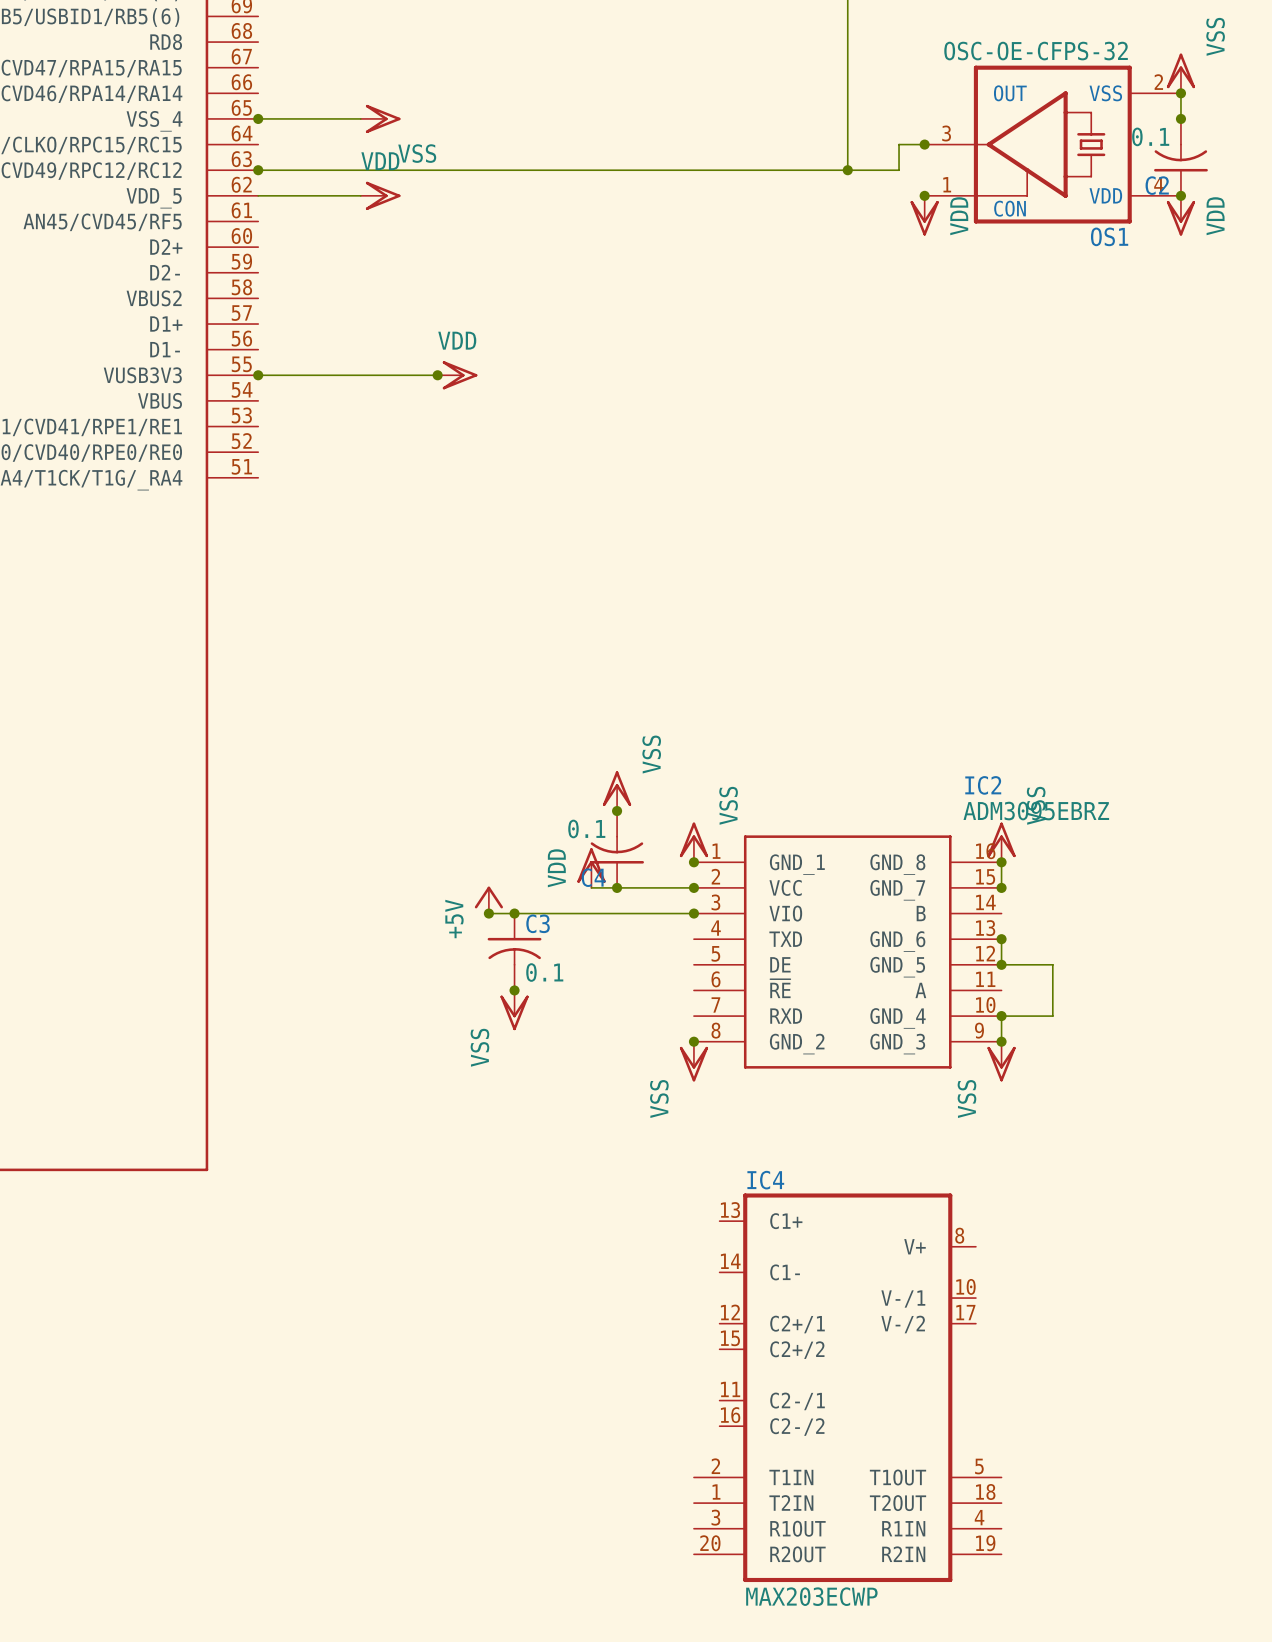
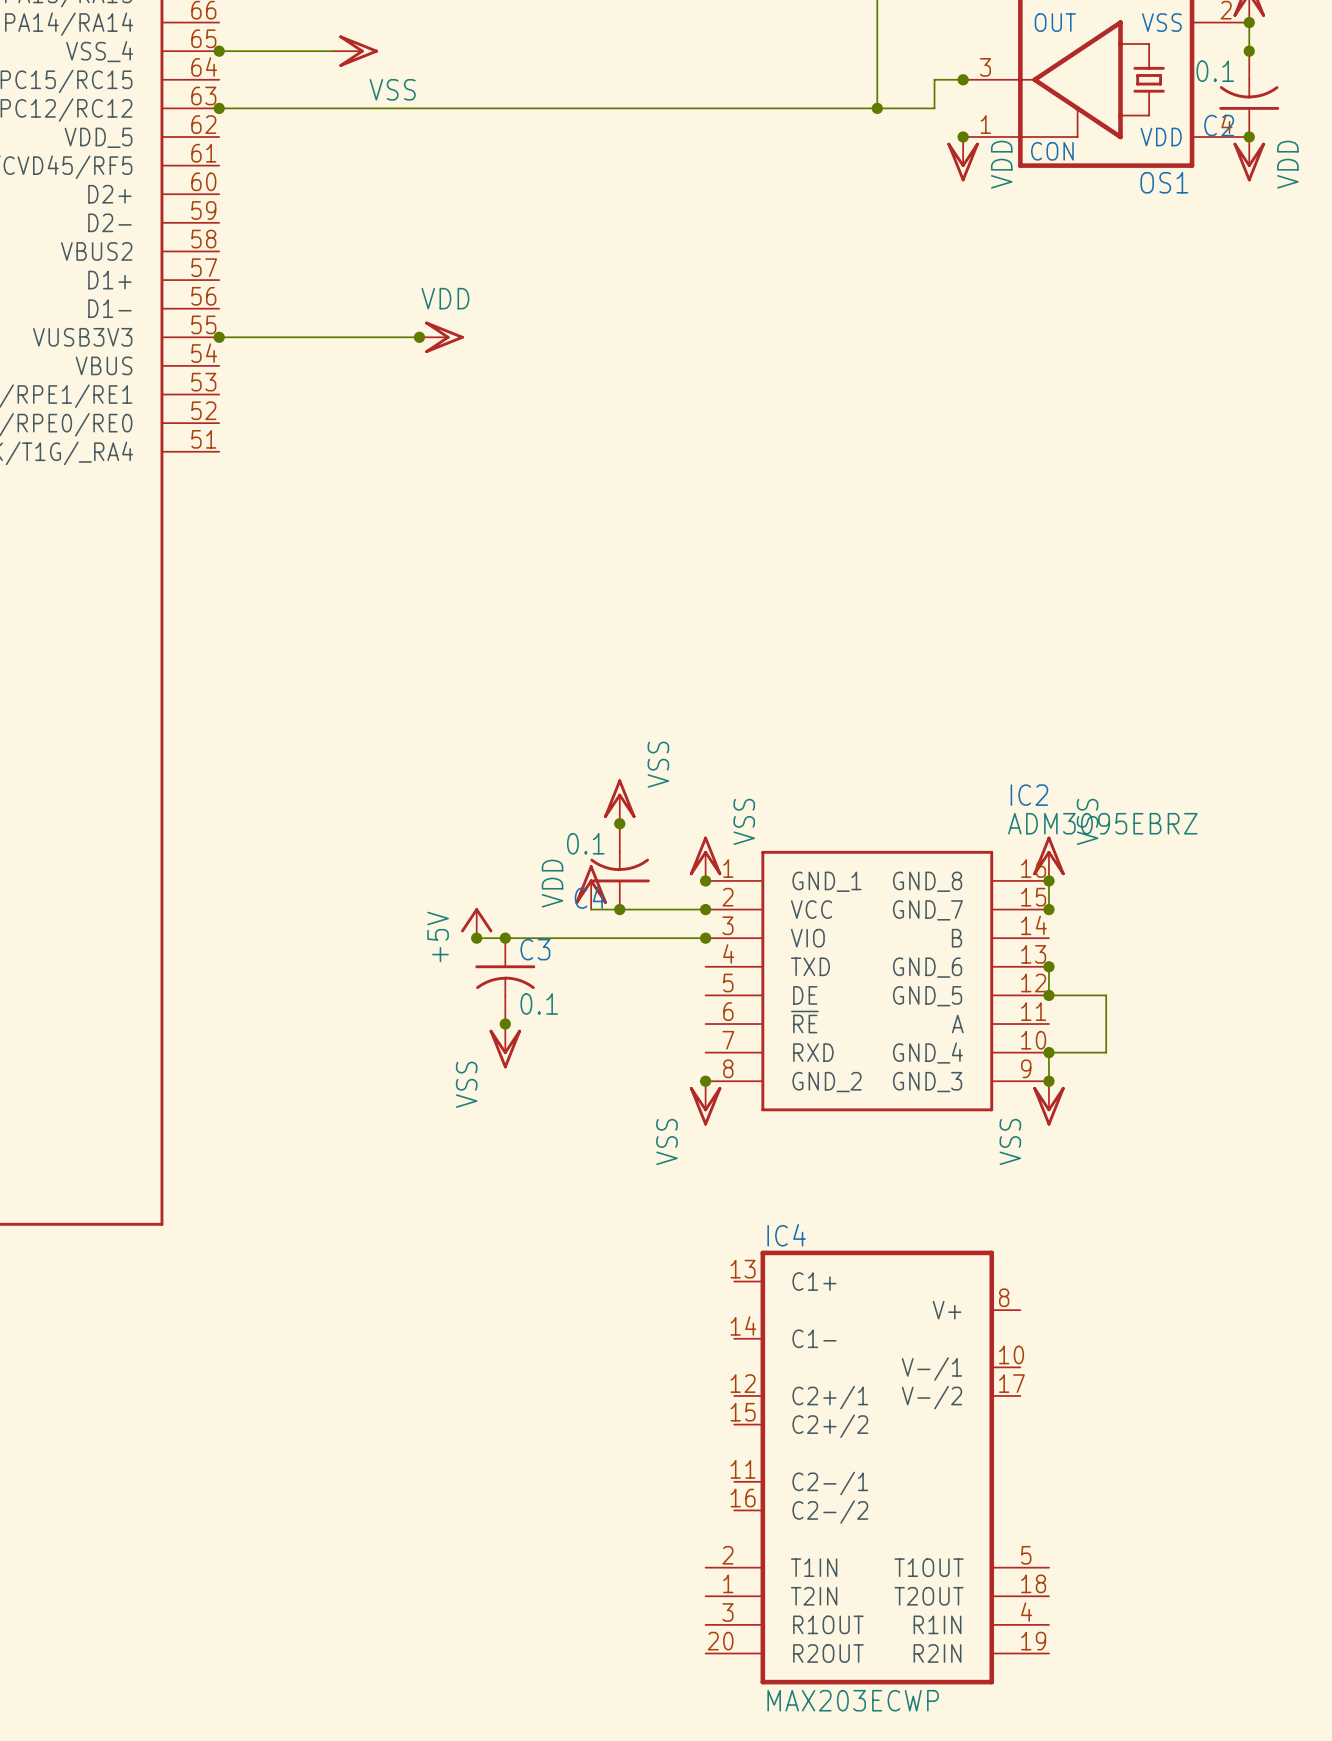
wire: (258, 195) (360, 195) -> none
power symbol: VDD (380, 195) -> none

